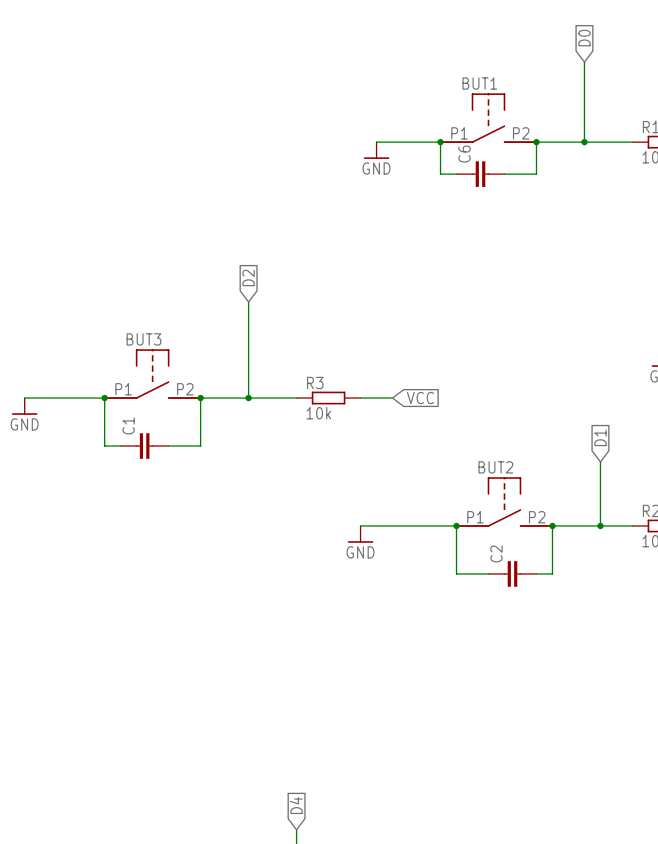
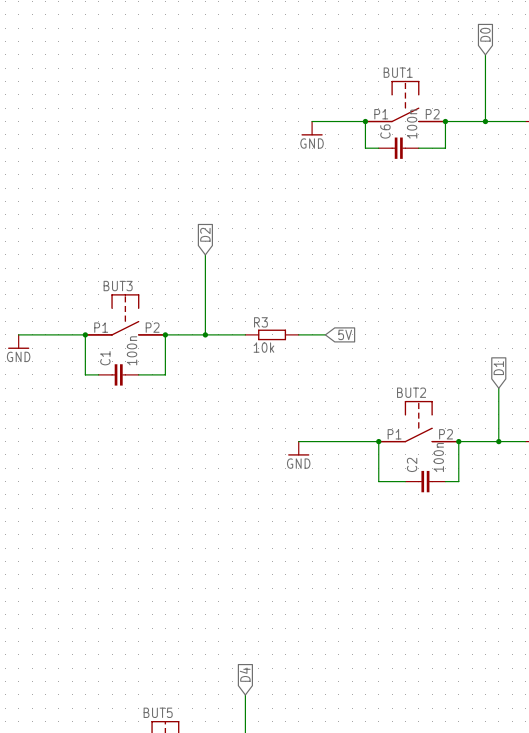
C6 value: none -> 100n (412, 124)
global label: VCC (420, 398) -> 5V (345, 334)
C1 value: none -> 100n (132, 350)
C2 value: none -> 100n (438, 457)

